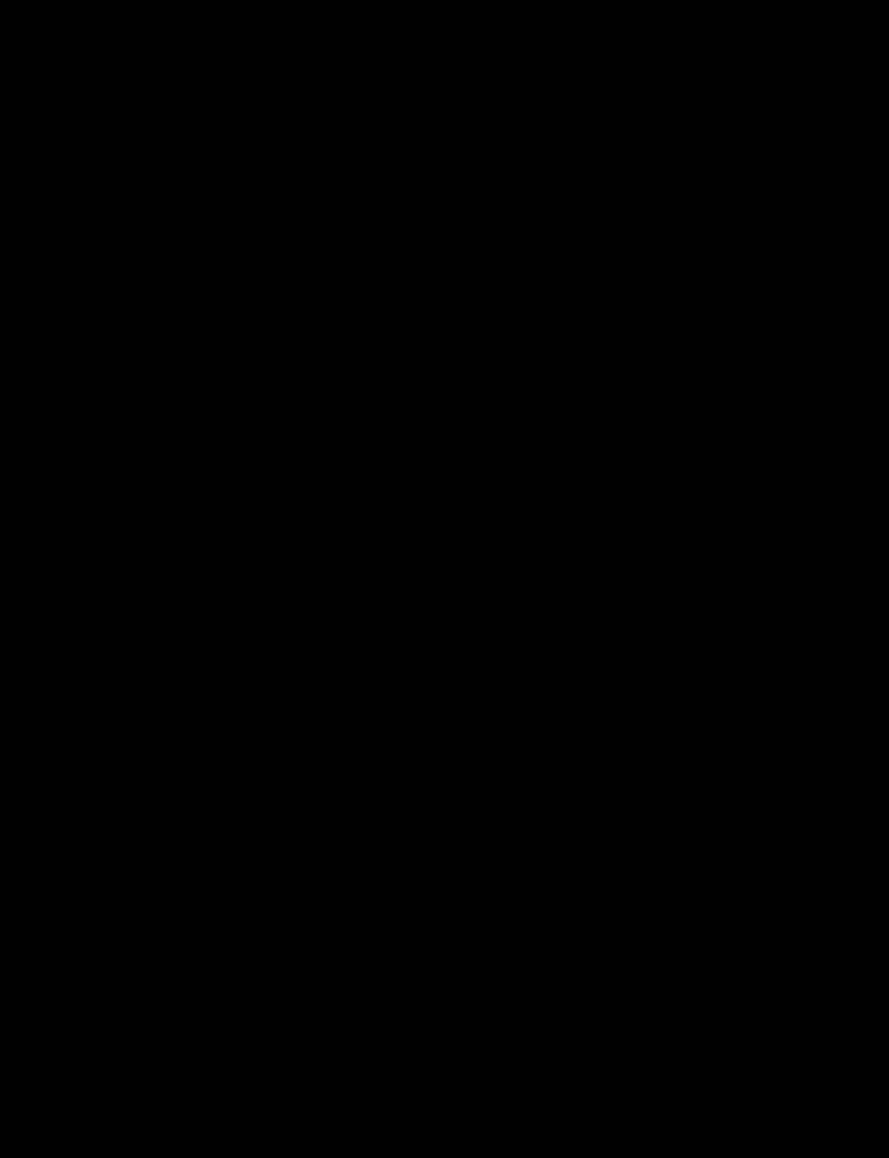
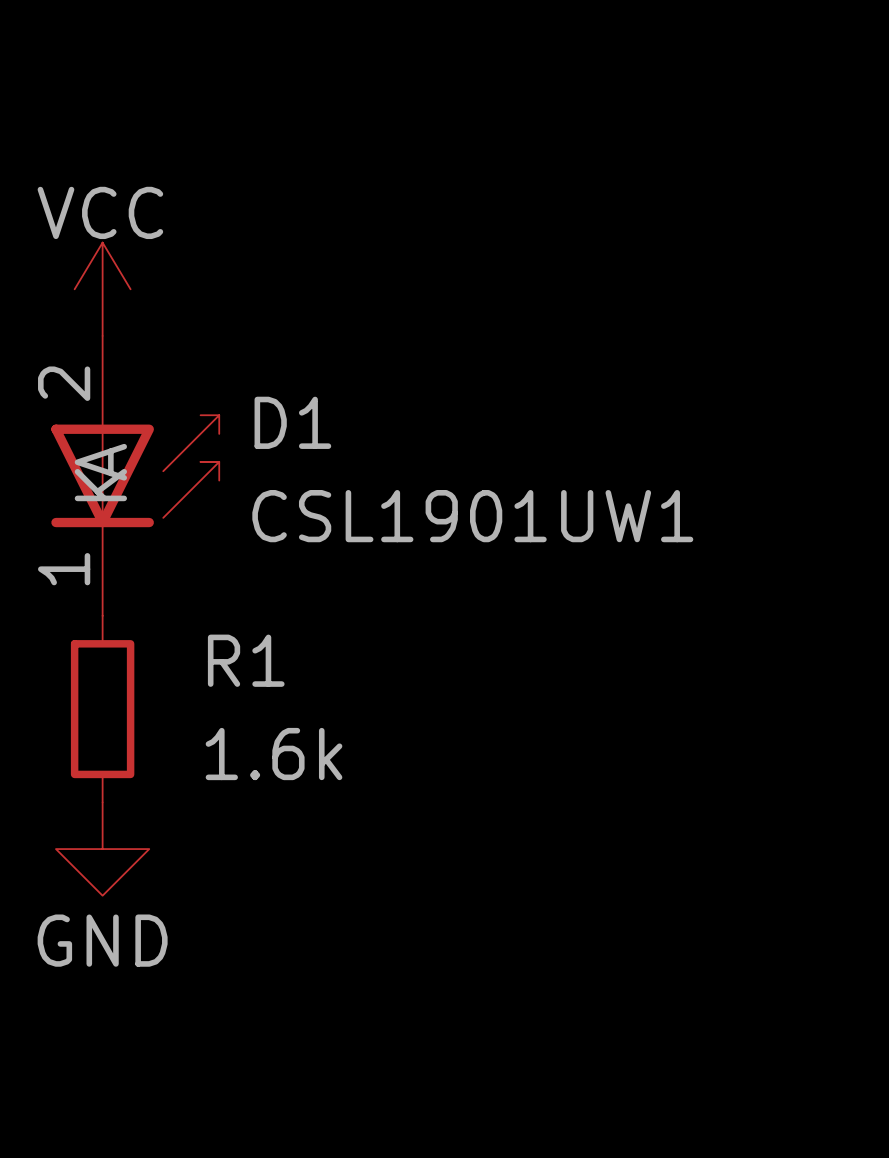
power symbol: none -> VCC (102, 289)
D1: none -> CSL1901UW1 (135, 475)
R1: none -> 1.6k (102, 709)
power symbol: none -> GND (102, 849)

